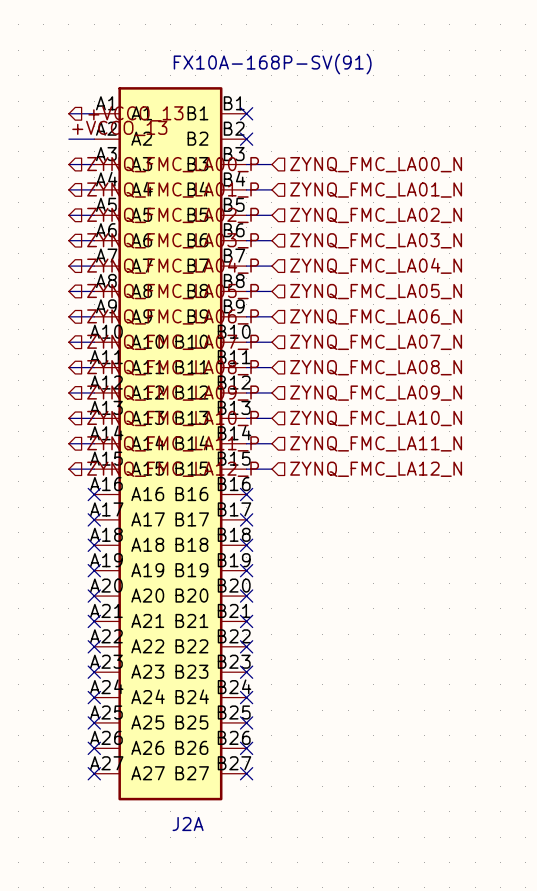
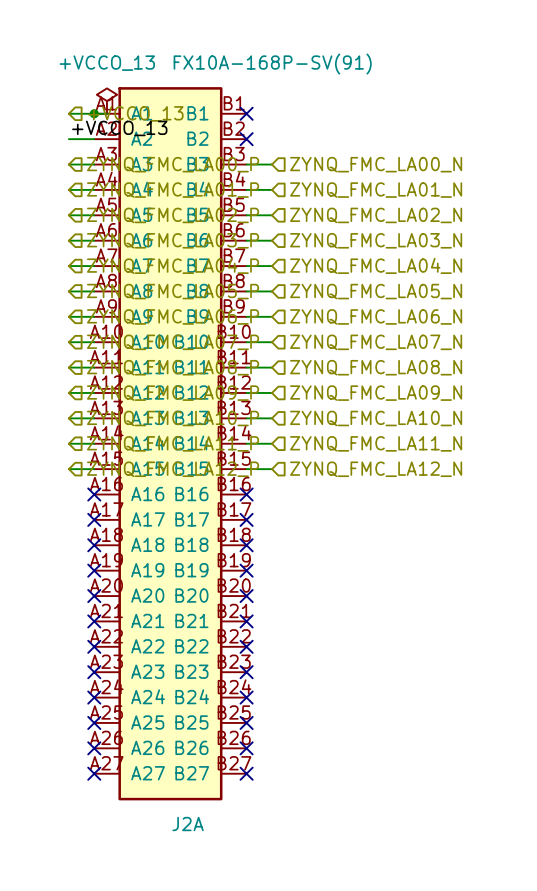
power symbol: none -> +VCCO_13 (106, 101)
junction: none -> (94, 113)

